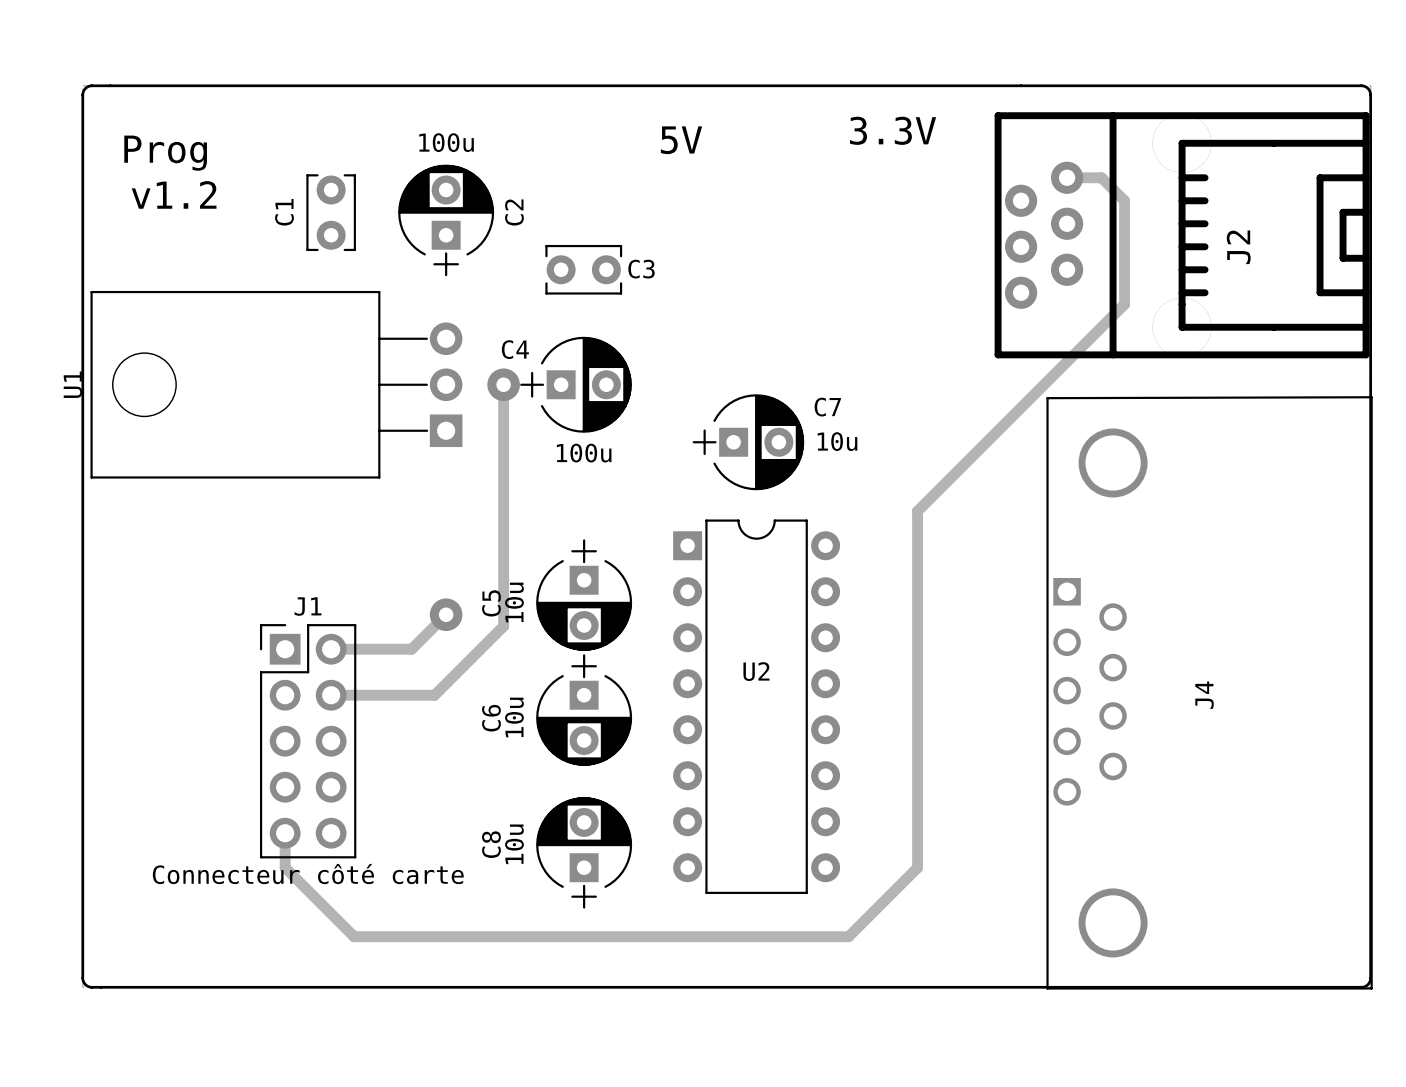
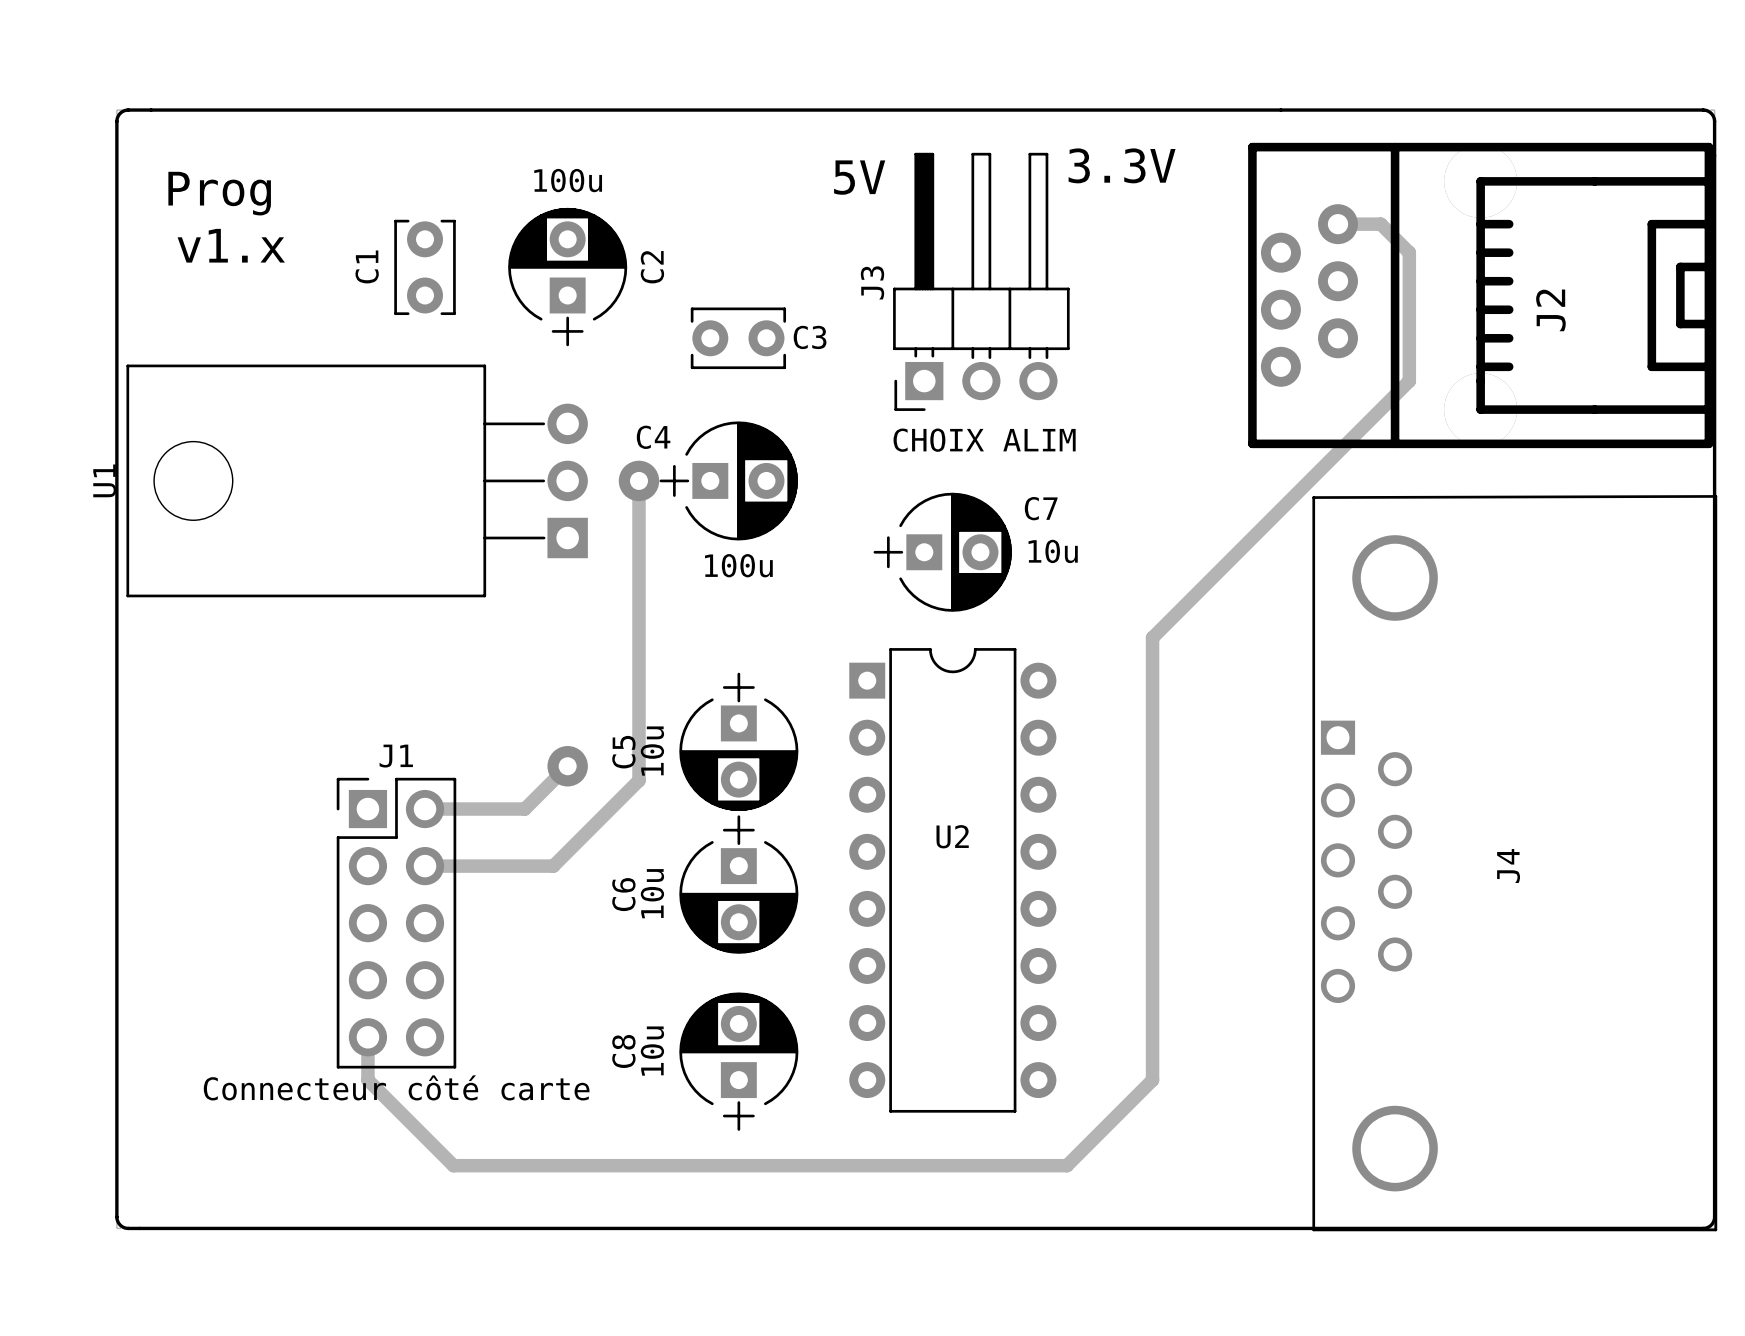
text: v1.2 (174, 194) -> v1.x (231, 245)
J3: none -> CHOIX ALIM (981, 281)

